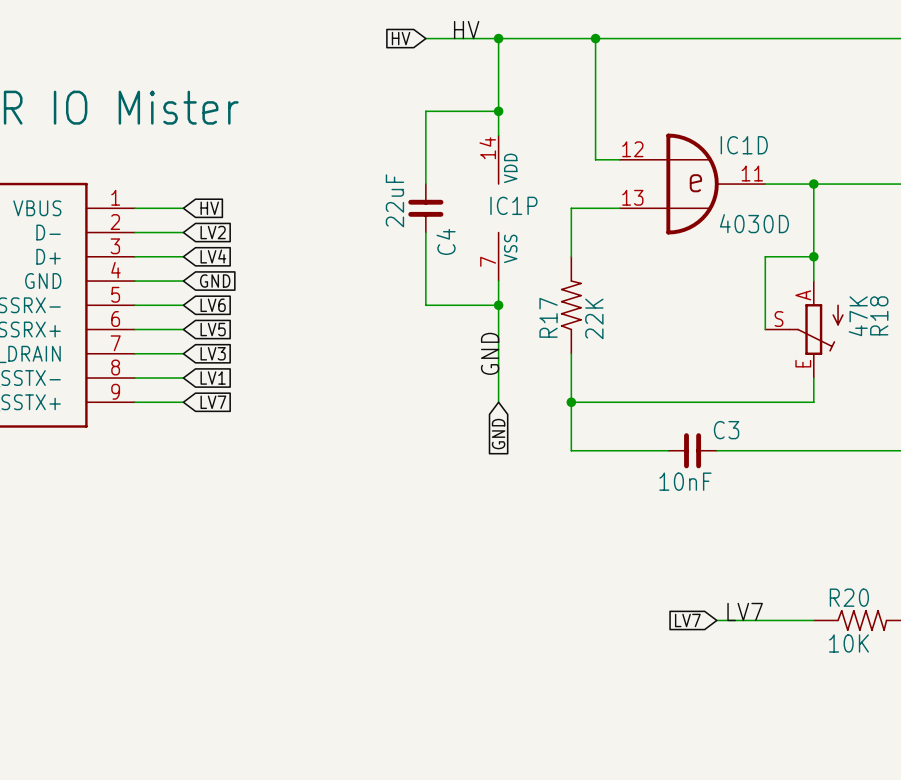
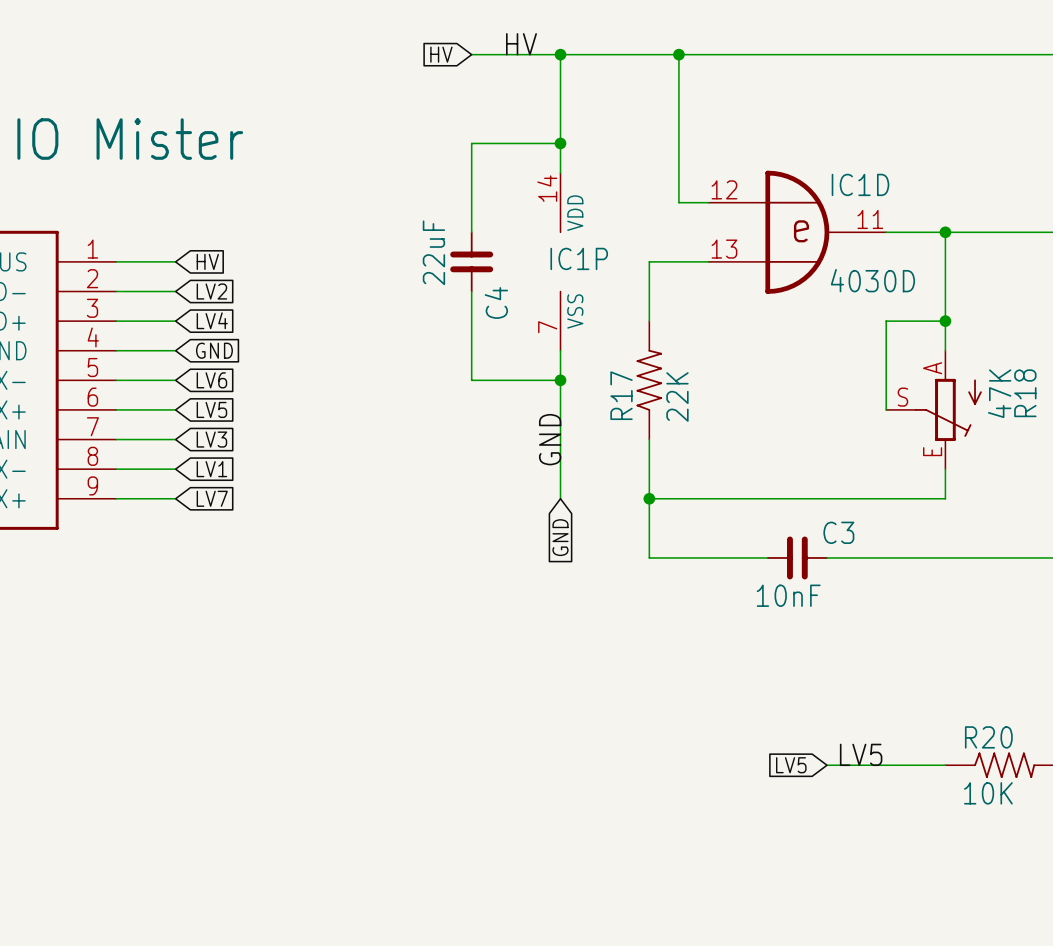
label: LV7 (745, 611) -> LV5 (861, 754)
global label: LV7 (687, 620) -> LV5 (791, 765)

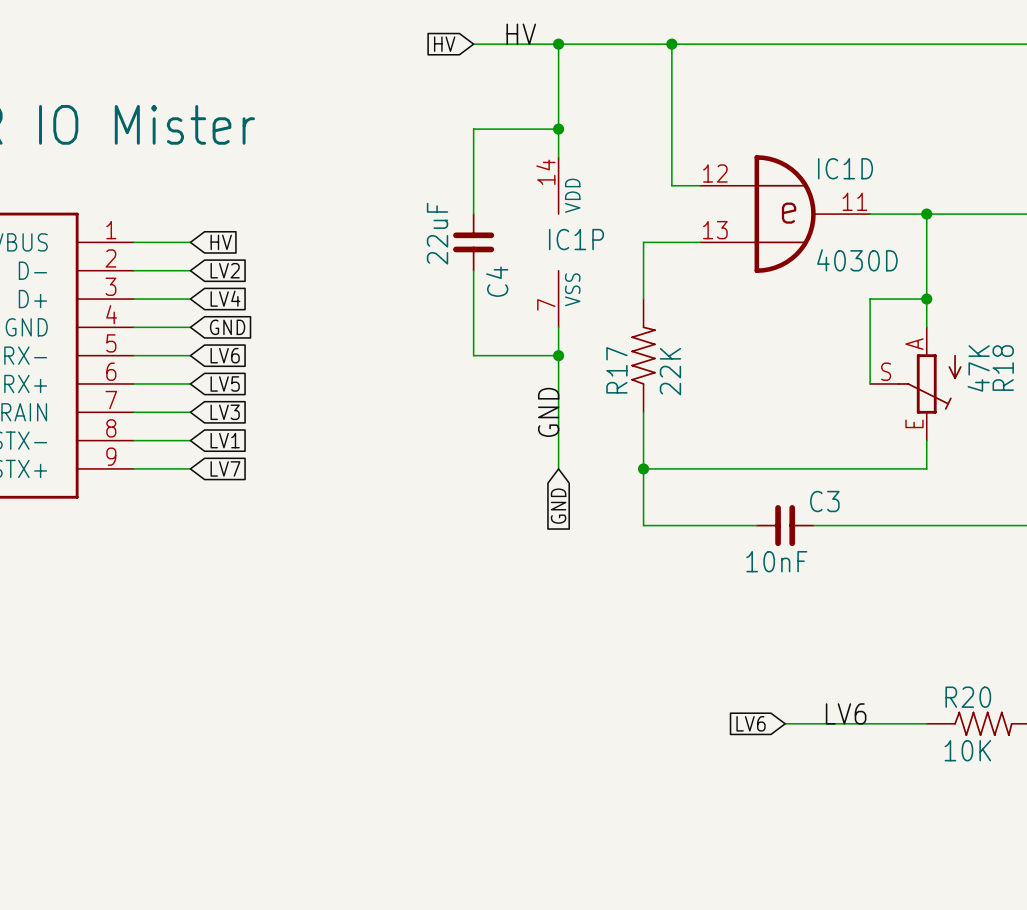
label: LV5 (861, 754) -> LV6 (846, 713)
global label: LV5 (791, 765) -> LV6 (751, 723)
wire: none -> (785, 723) (813, 723)

